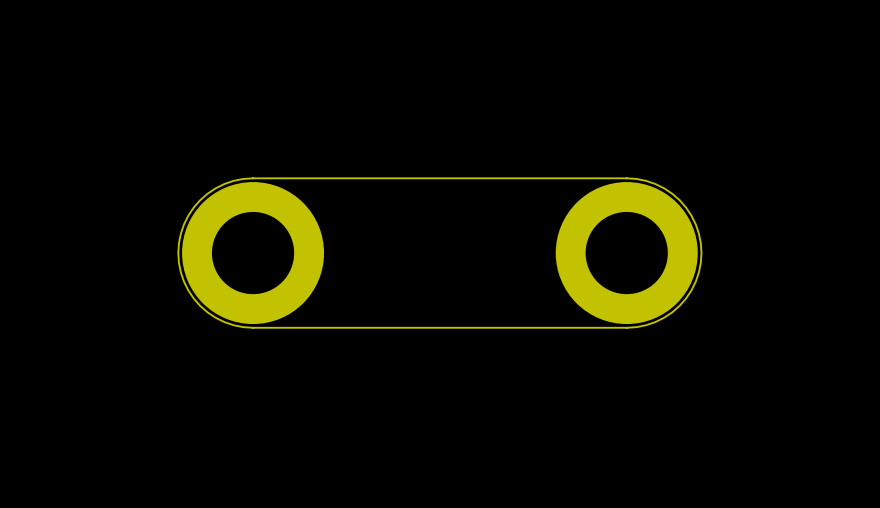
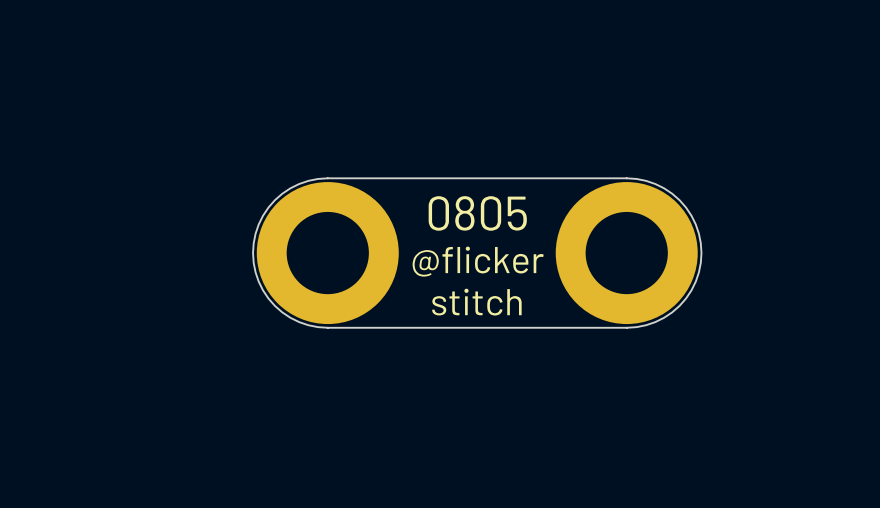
board edge: (327, 178) (243, 178) (215, 188) (200, 200) (188, 215) (180, 233) (178, 253) (180, 272) (188, 290) (200, 305) (215, 317) (243, 327) (327, 327) -> (327, 178) (299, 184) (274, 200) (258, 224) (253, 253) (258, 281) (274, 305) (299, 322) (327, 327)
text: none -> 0805 (477, 213)
part position: (253, 253) -> (327, 253)
text: none -> @flicker (478, 261)
text: none -> stitch (476, 302)

